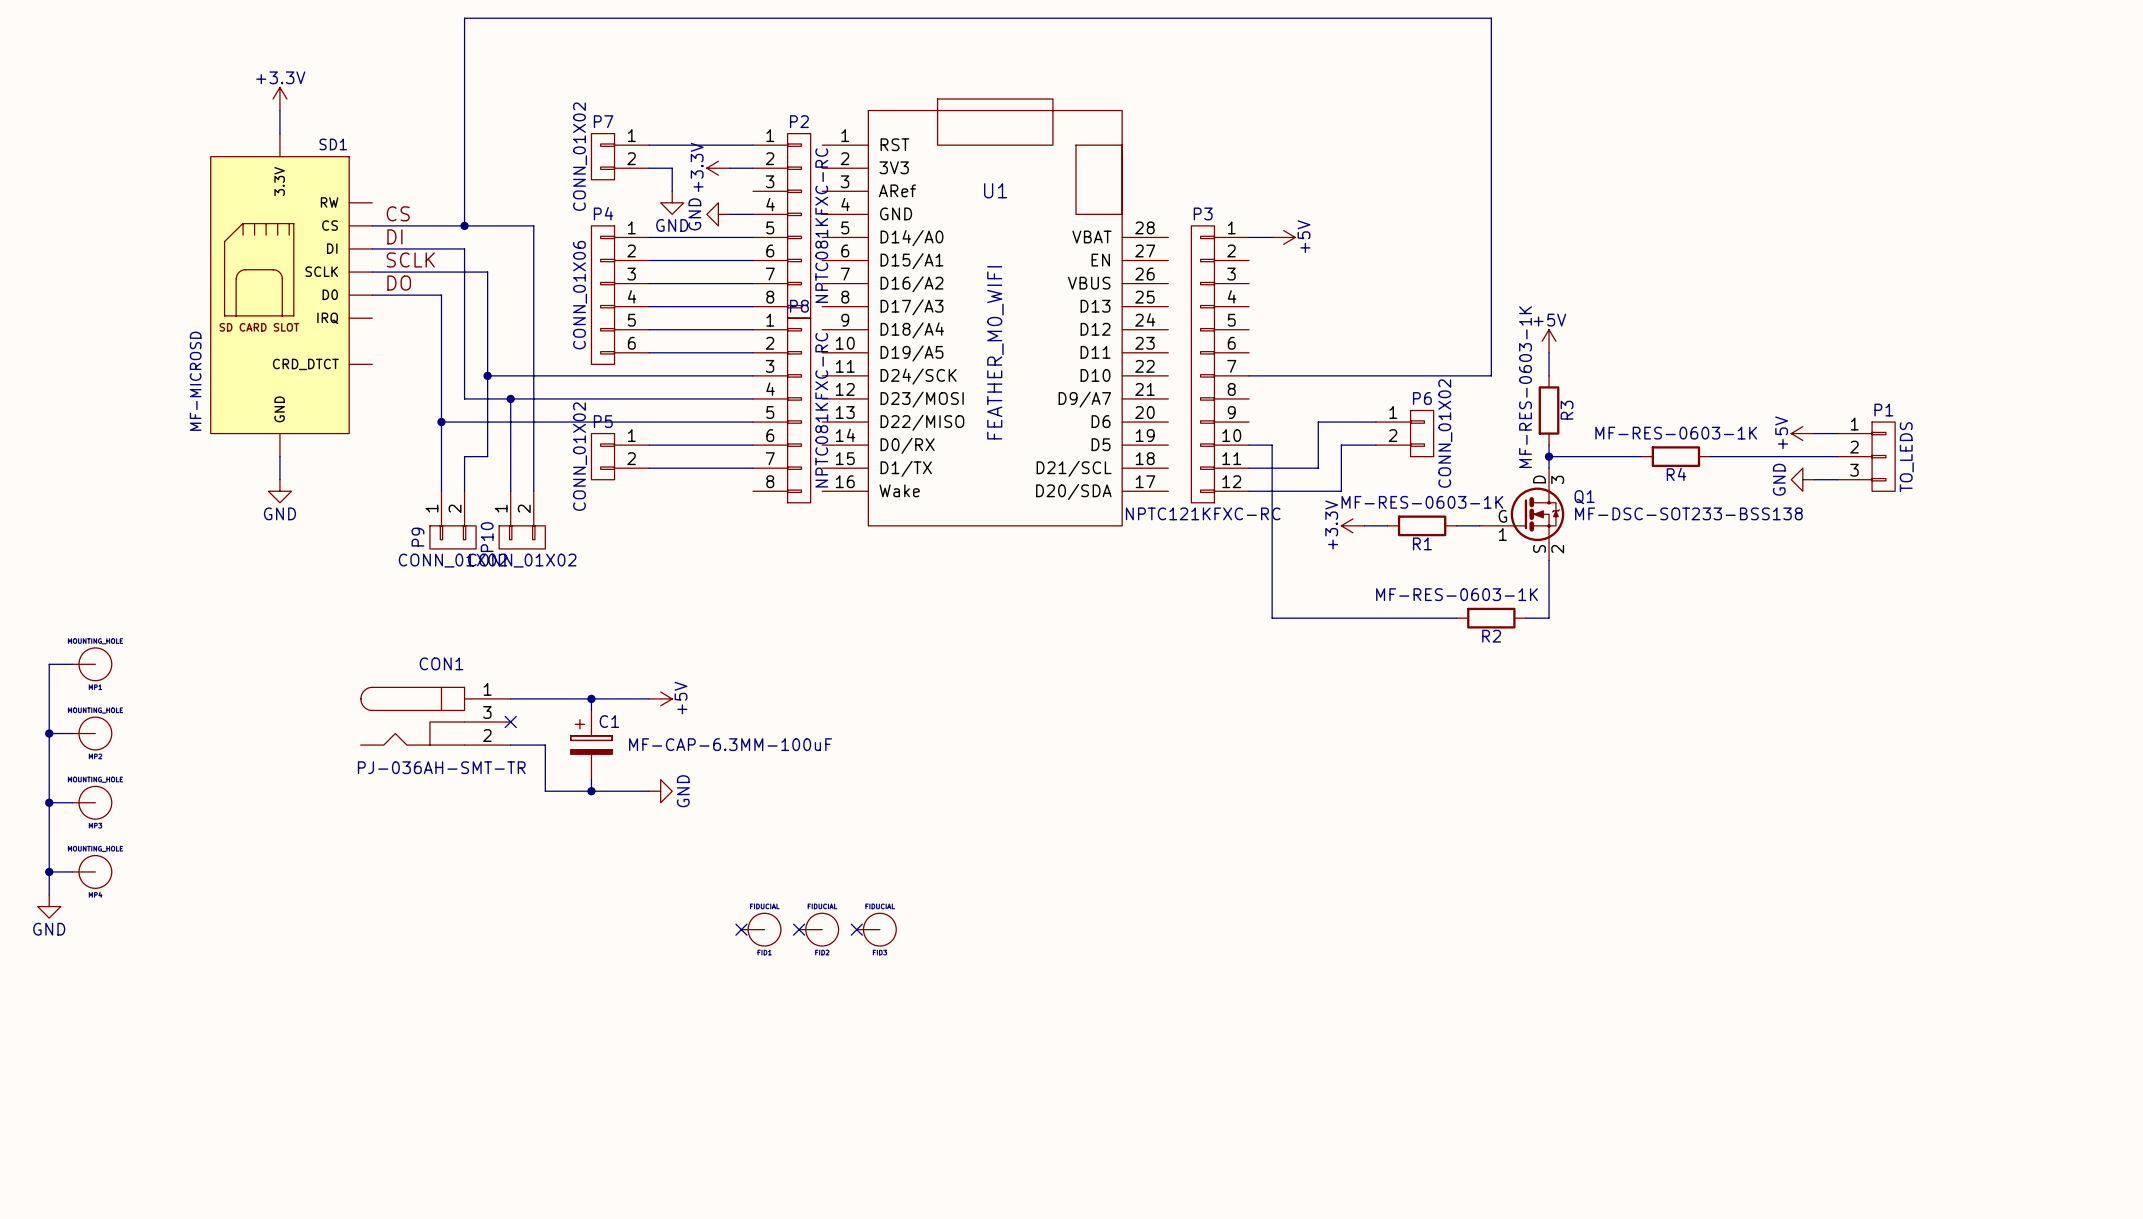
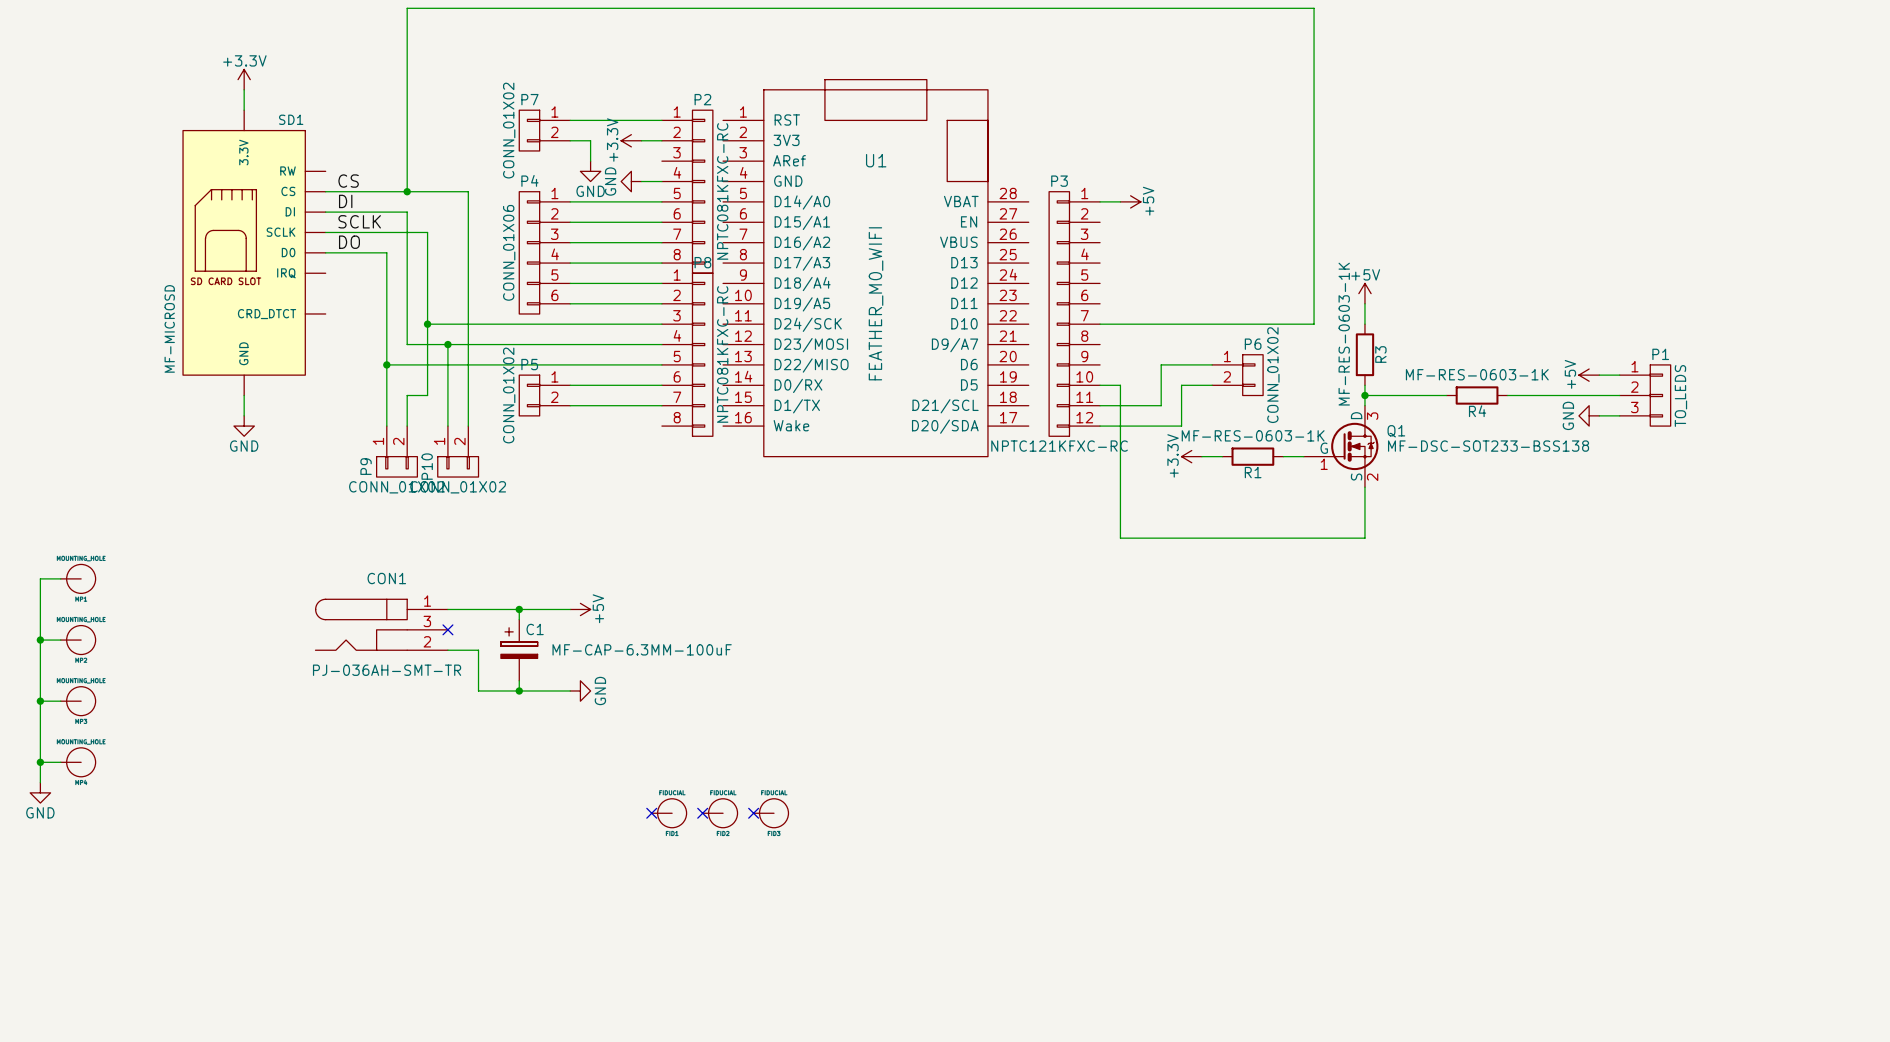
wire: none -> (1283, 538) (1344, 538)
R2: MF-RES-0603-1K (1491, 618) -> none

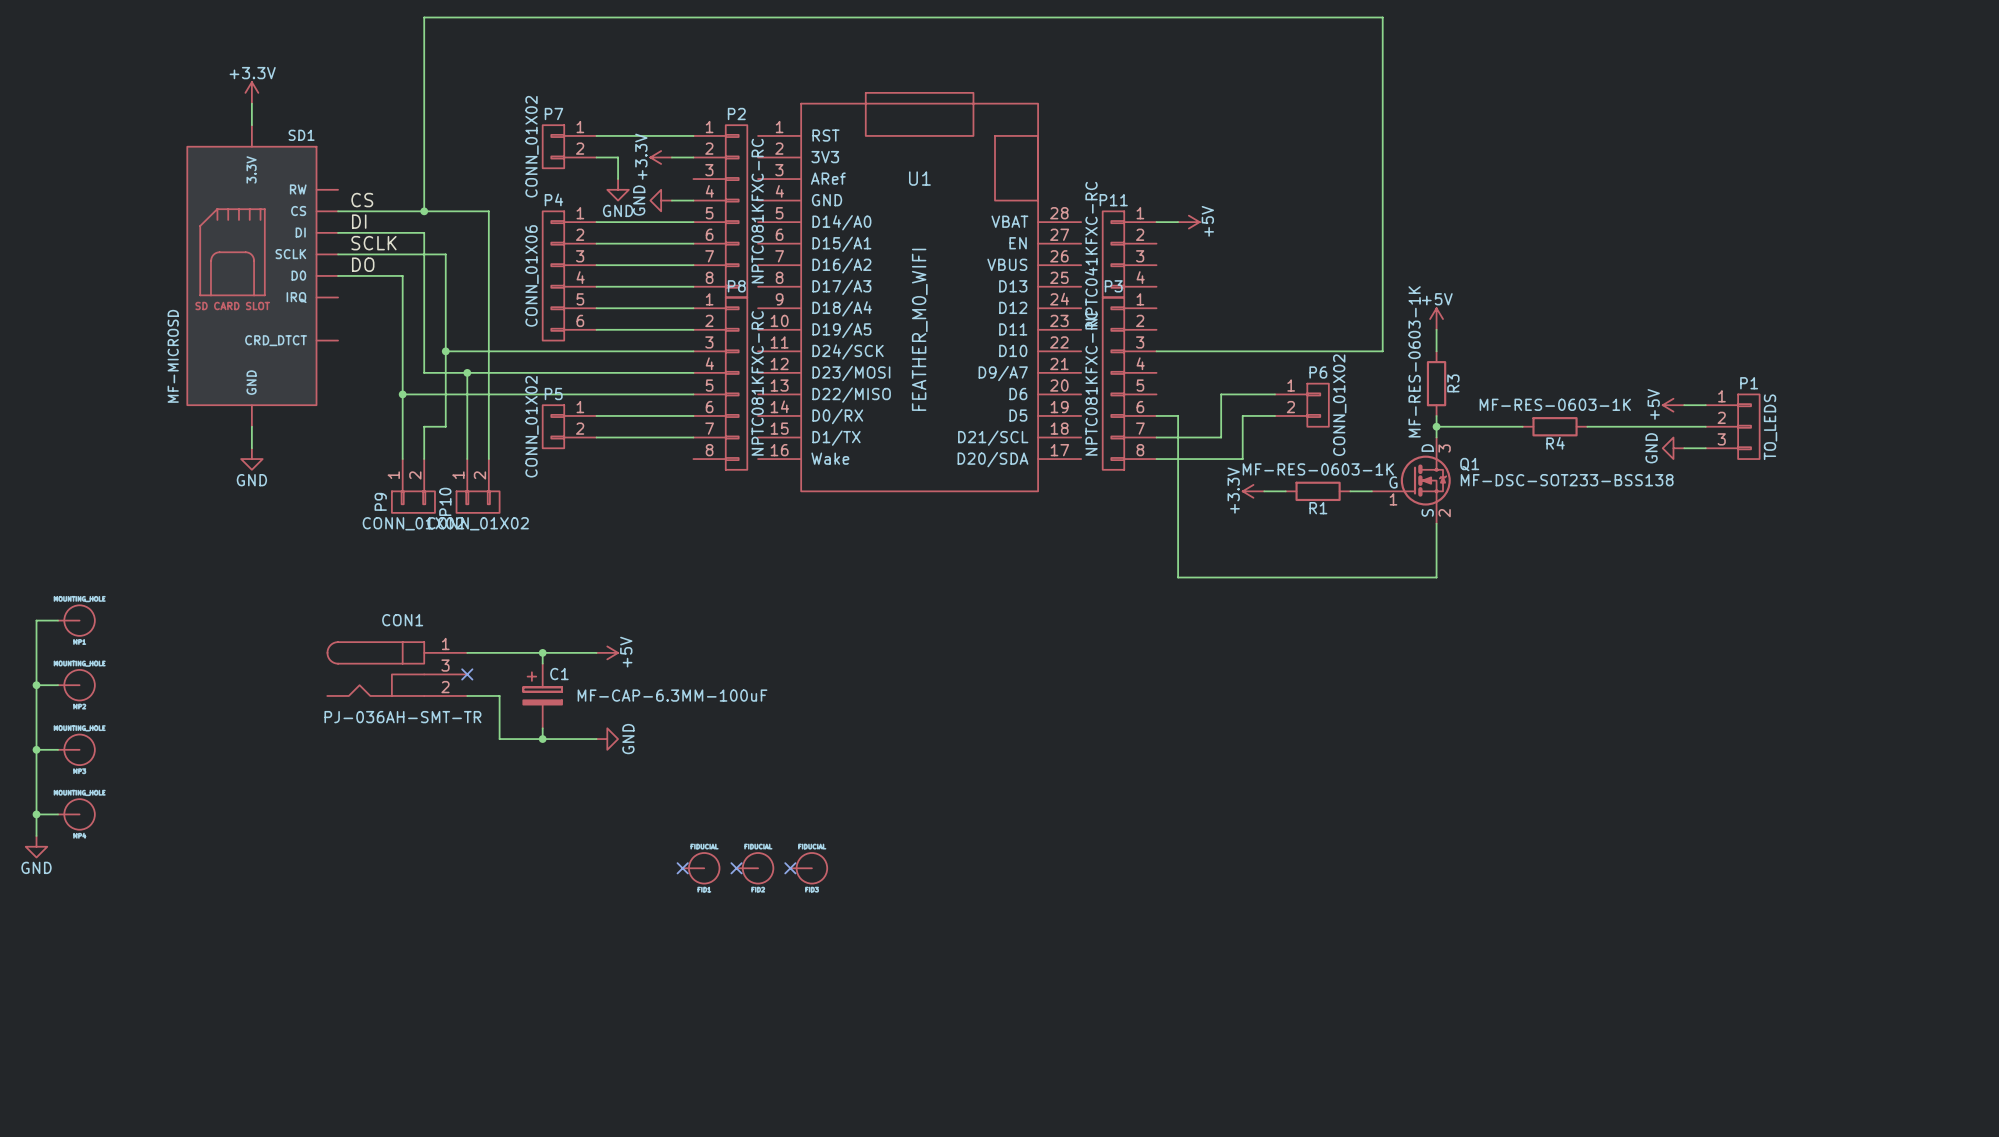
P3 name position: P3 (1059, 181) -> P3 (1113, 286)
P3 symbol: [1049, 191, 1101, 437] -> [1102, 297, 1157, 470]
P11: none -> NPTC041KFXC-RC (1129, 254)
P3 value: NPTC121KFXC-RC (1059, 446) -> NPTC081KFXC-RC (1091, 383)

